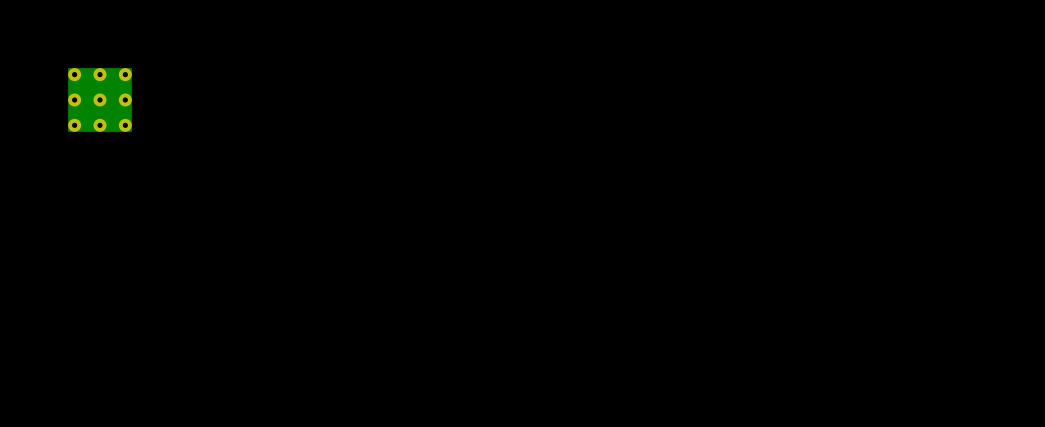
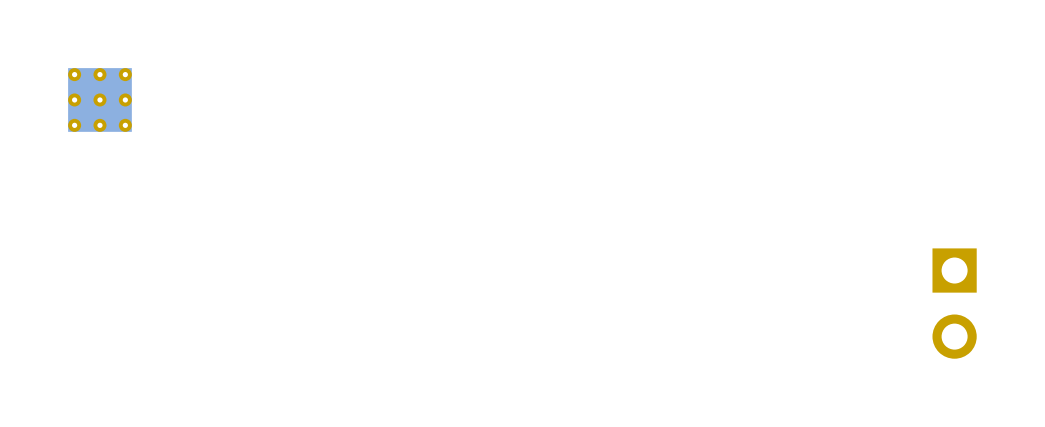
part: none -> (954, 303)

